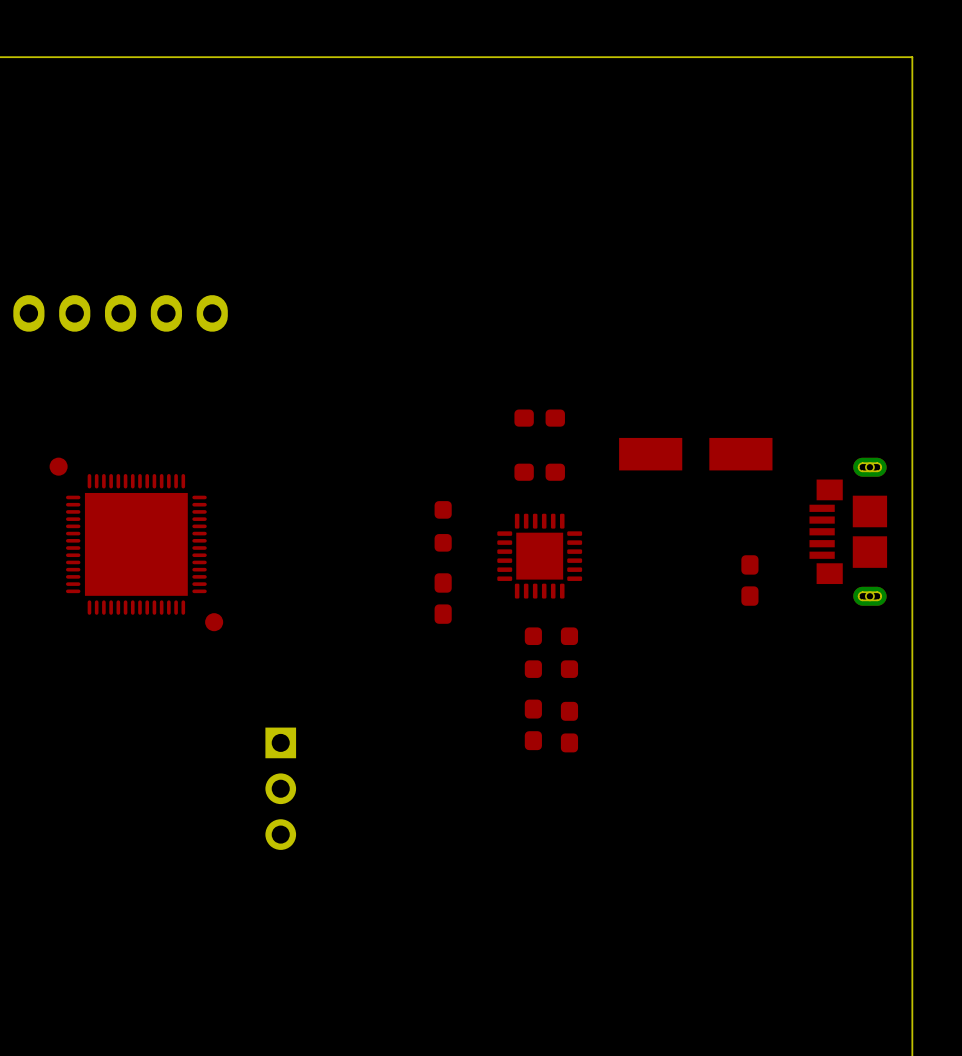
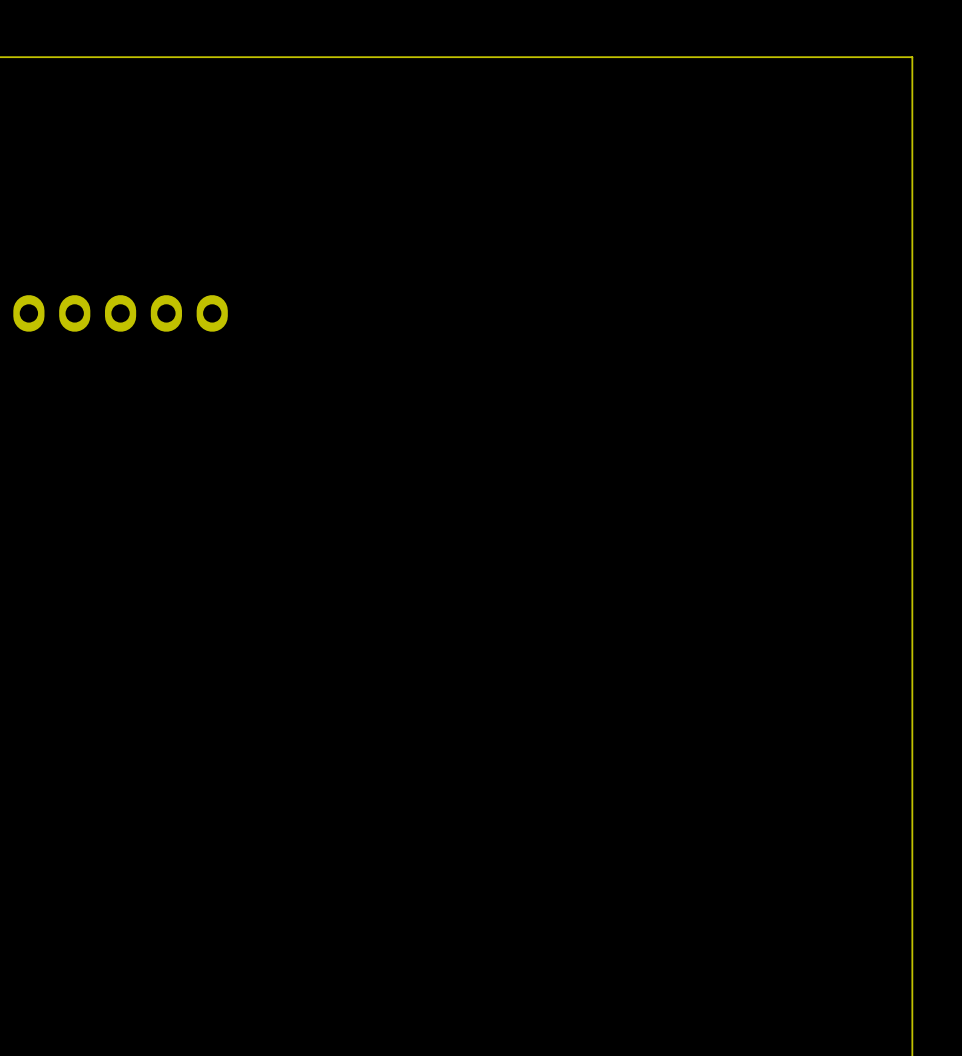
part: (539, 418) -> none
part: (695, 454) -> none
part: (539, 472) -> none
part: (443, 526) -> none
part: (848, 531) -> none
part: (136, 544) -> none
part: (539, 556) -> none
part: (749, 580) -> none
part: (443, 598) -> none
part: (533, 652) -> none
part: (569, 652) -> none
part: (533, 724) -> none
part: (569, 727) -> none
part: (280, 788) -> none

